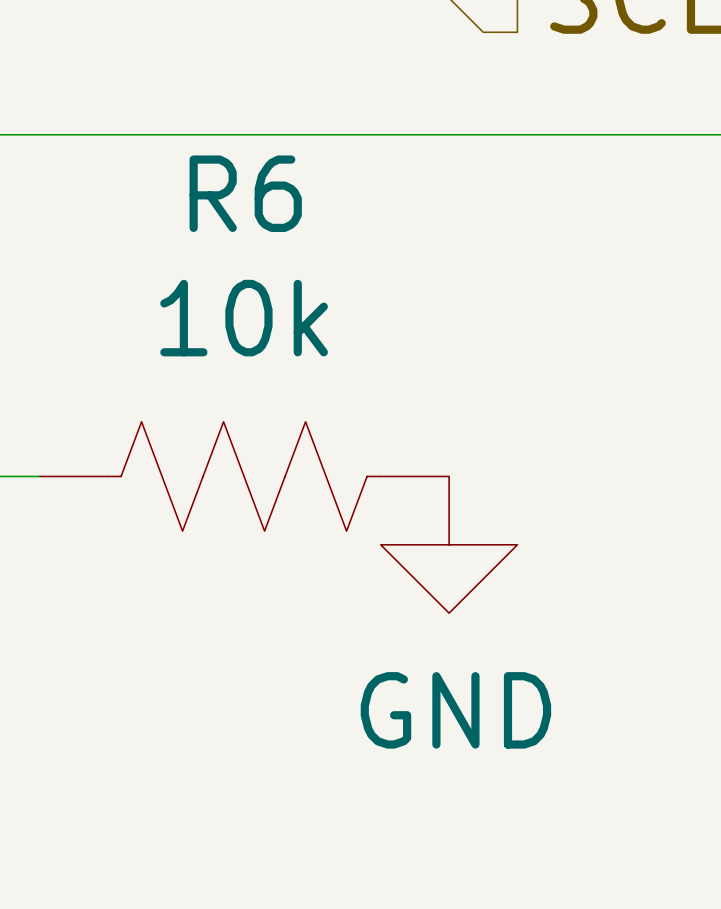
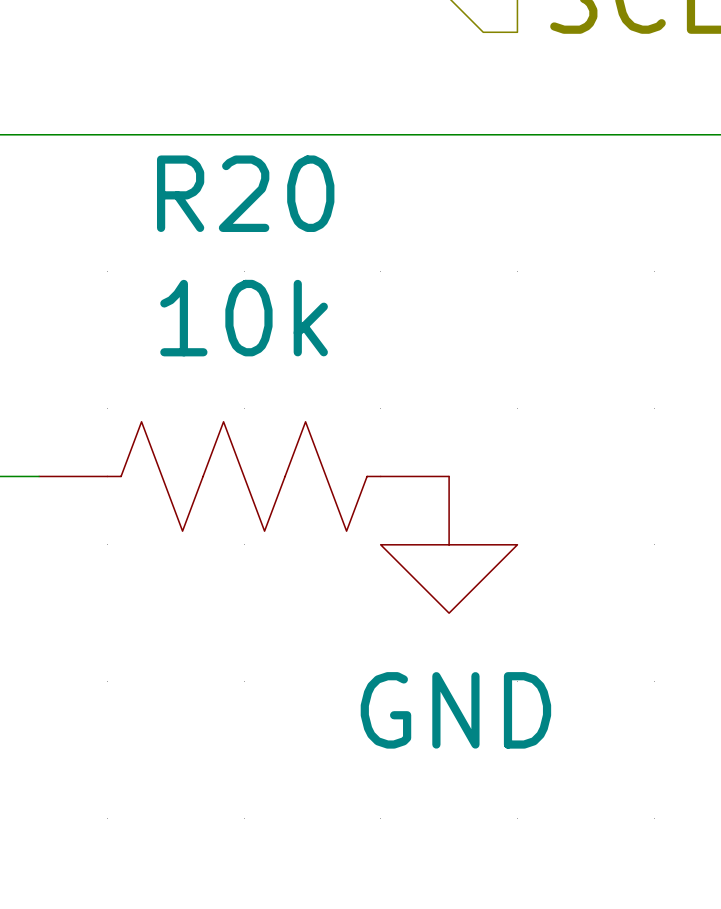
R6 name: R6 (245, 193) -> R20 (245, 193)

